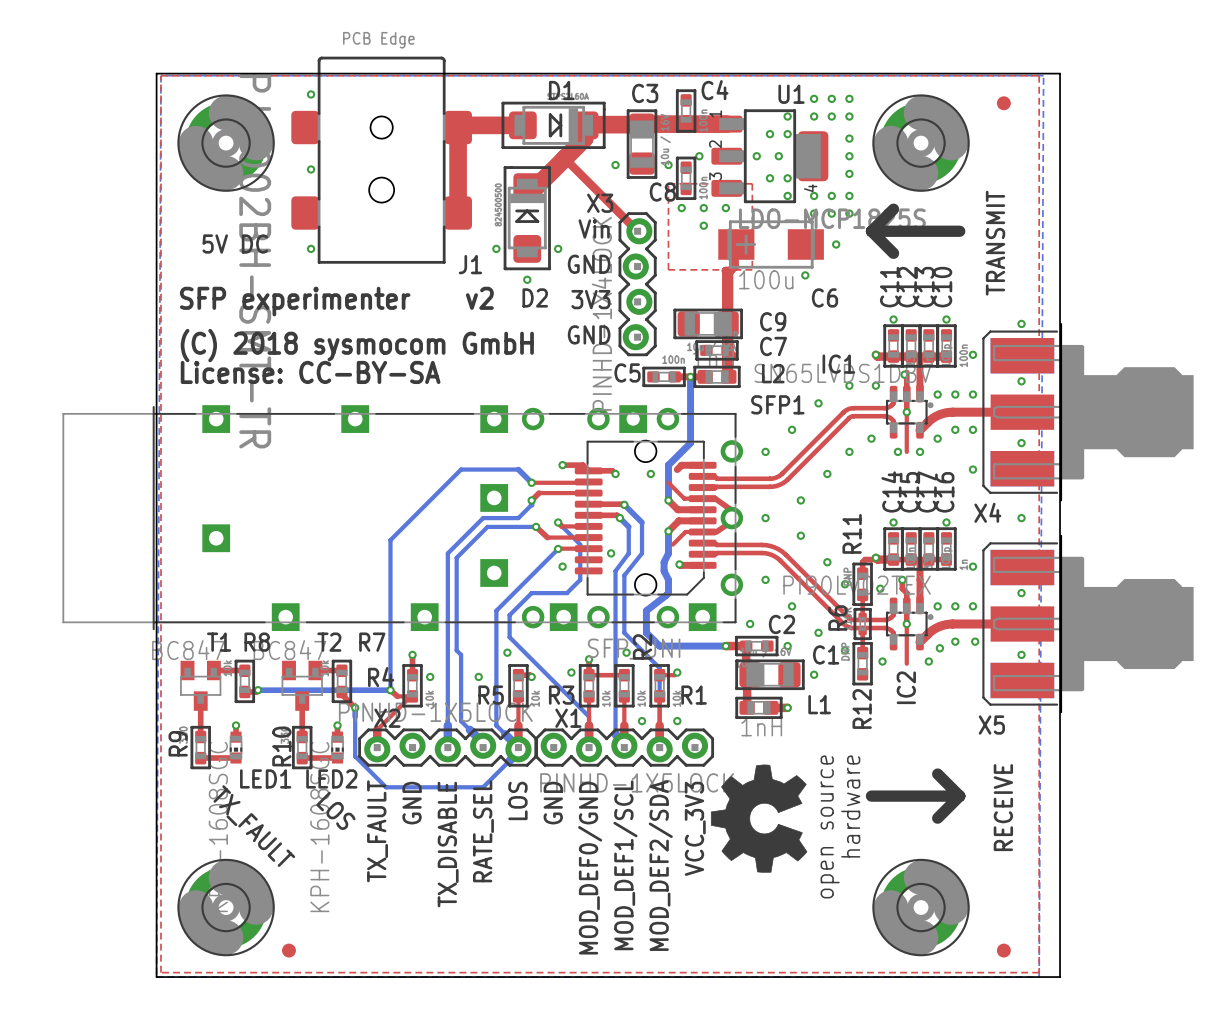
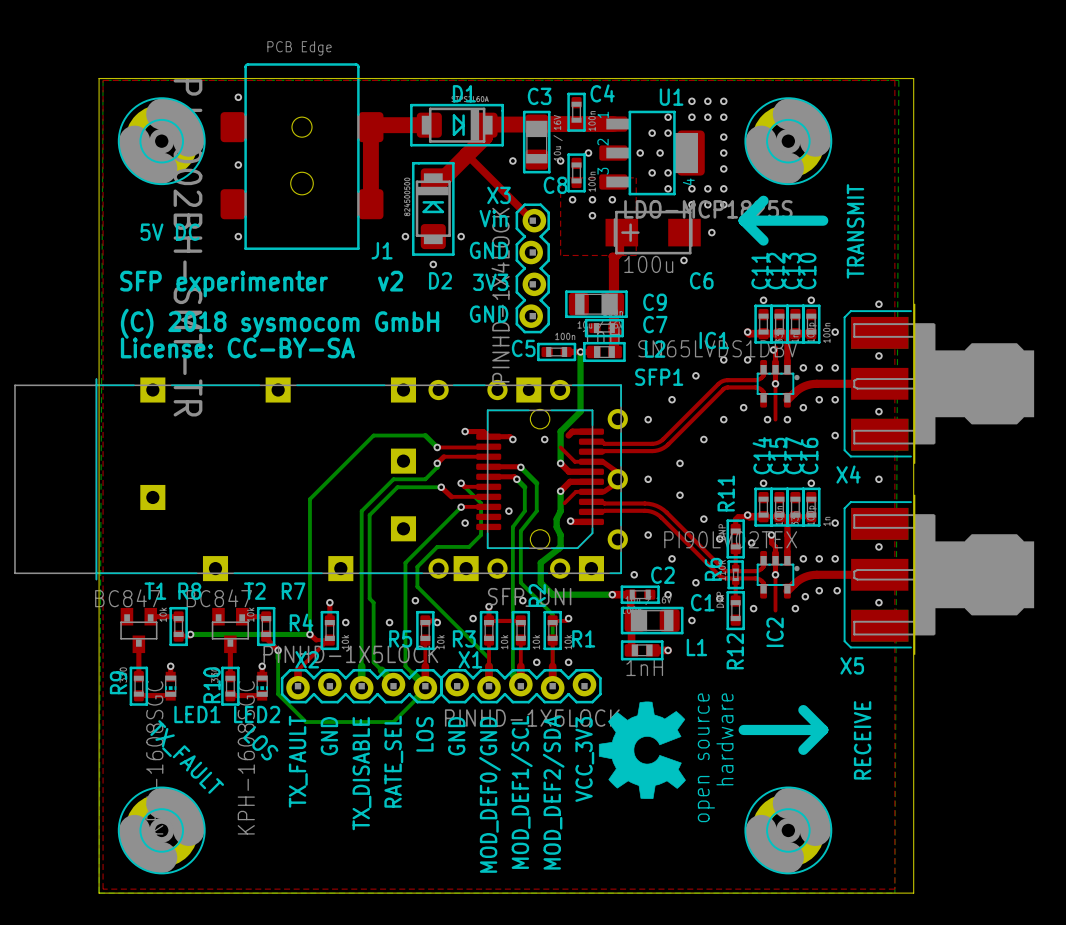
part: (1003, 103) -> none
part: (288, 950) -> none
part: (1003, 950) -> none

